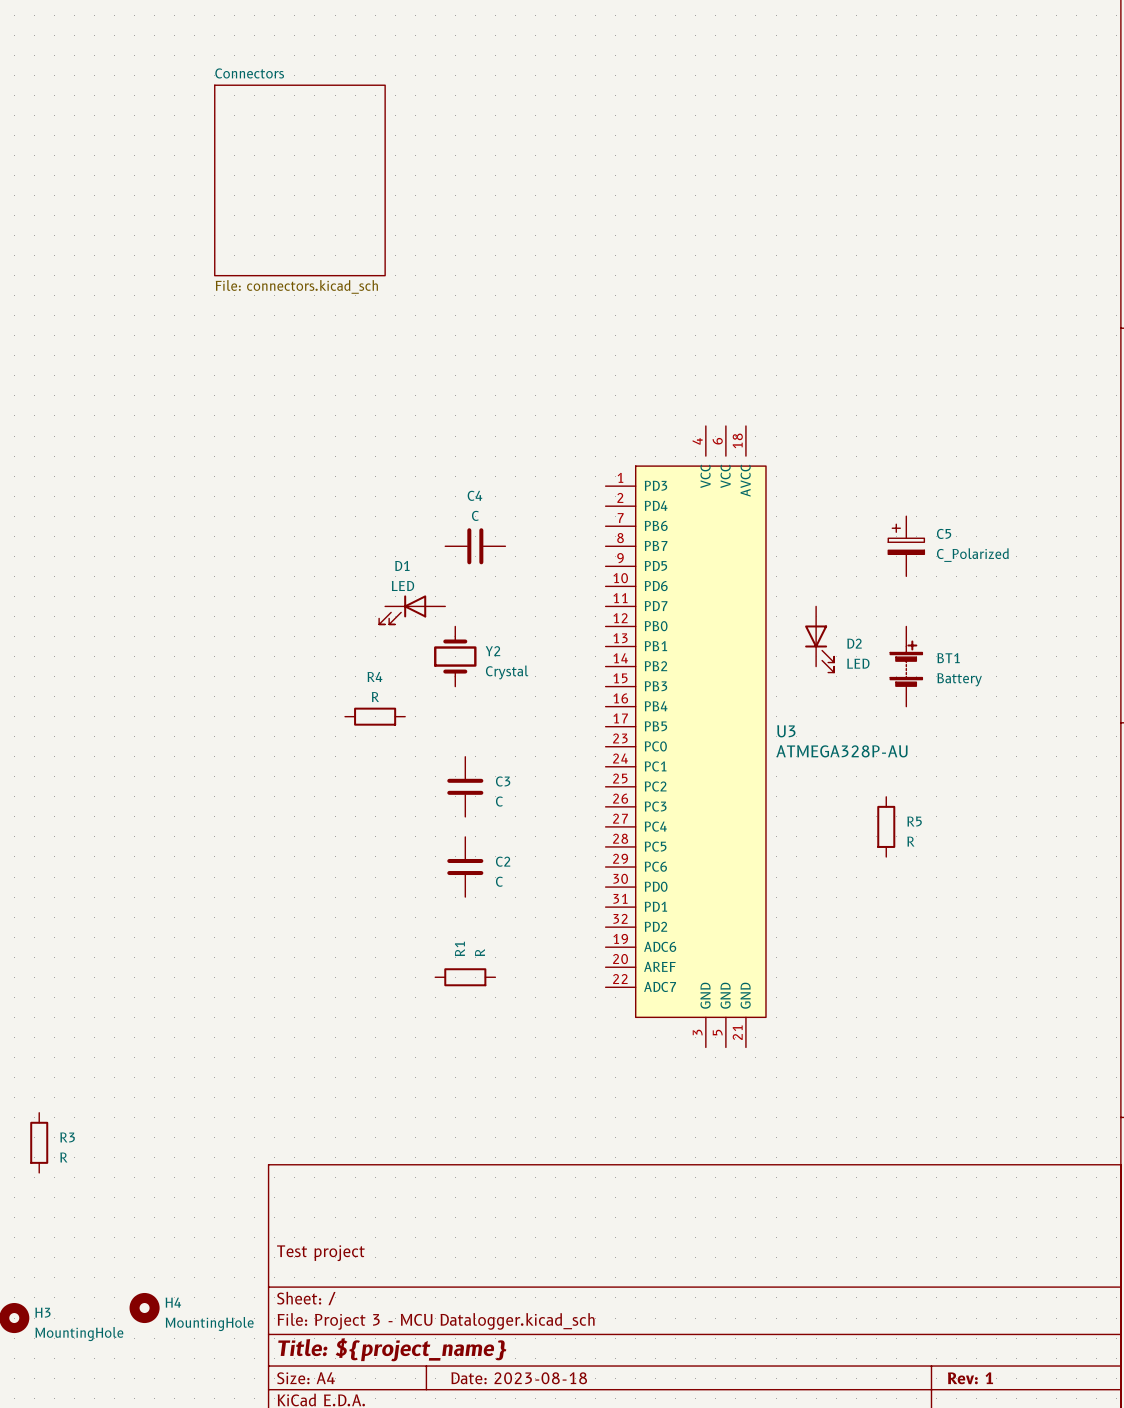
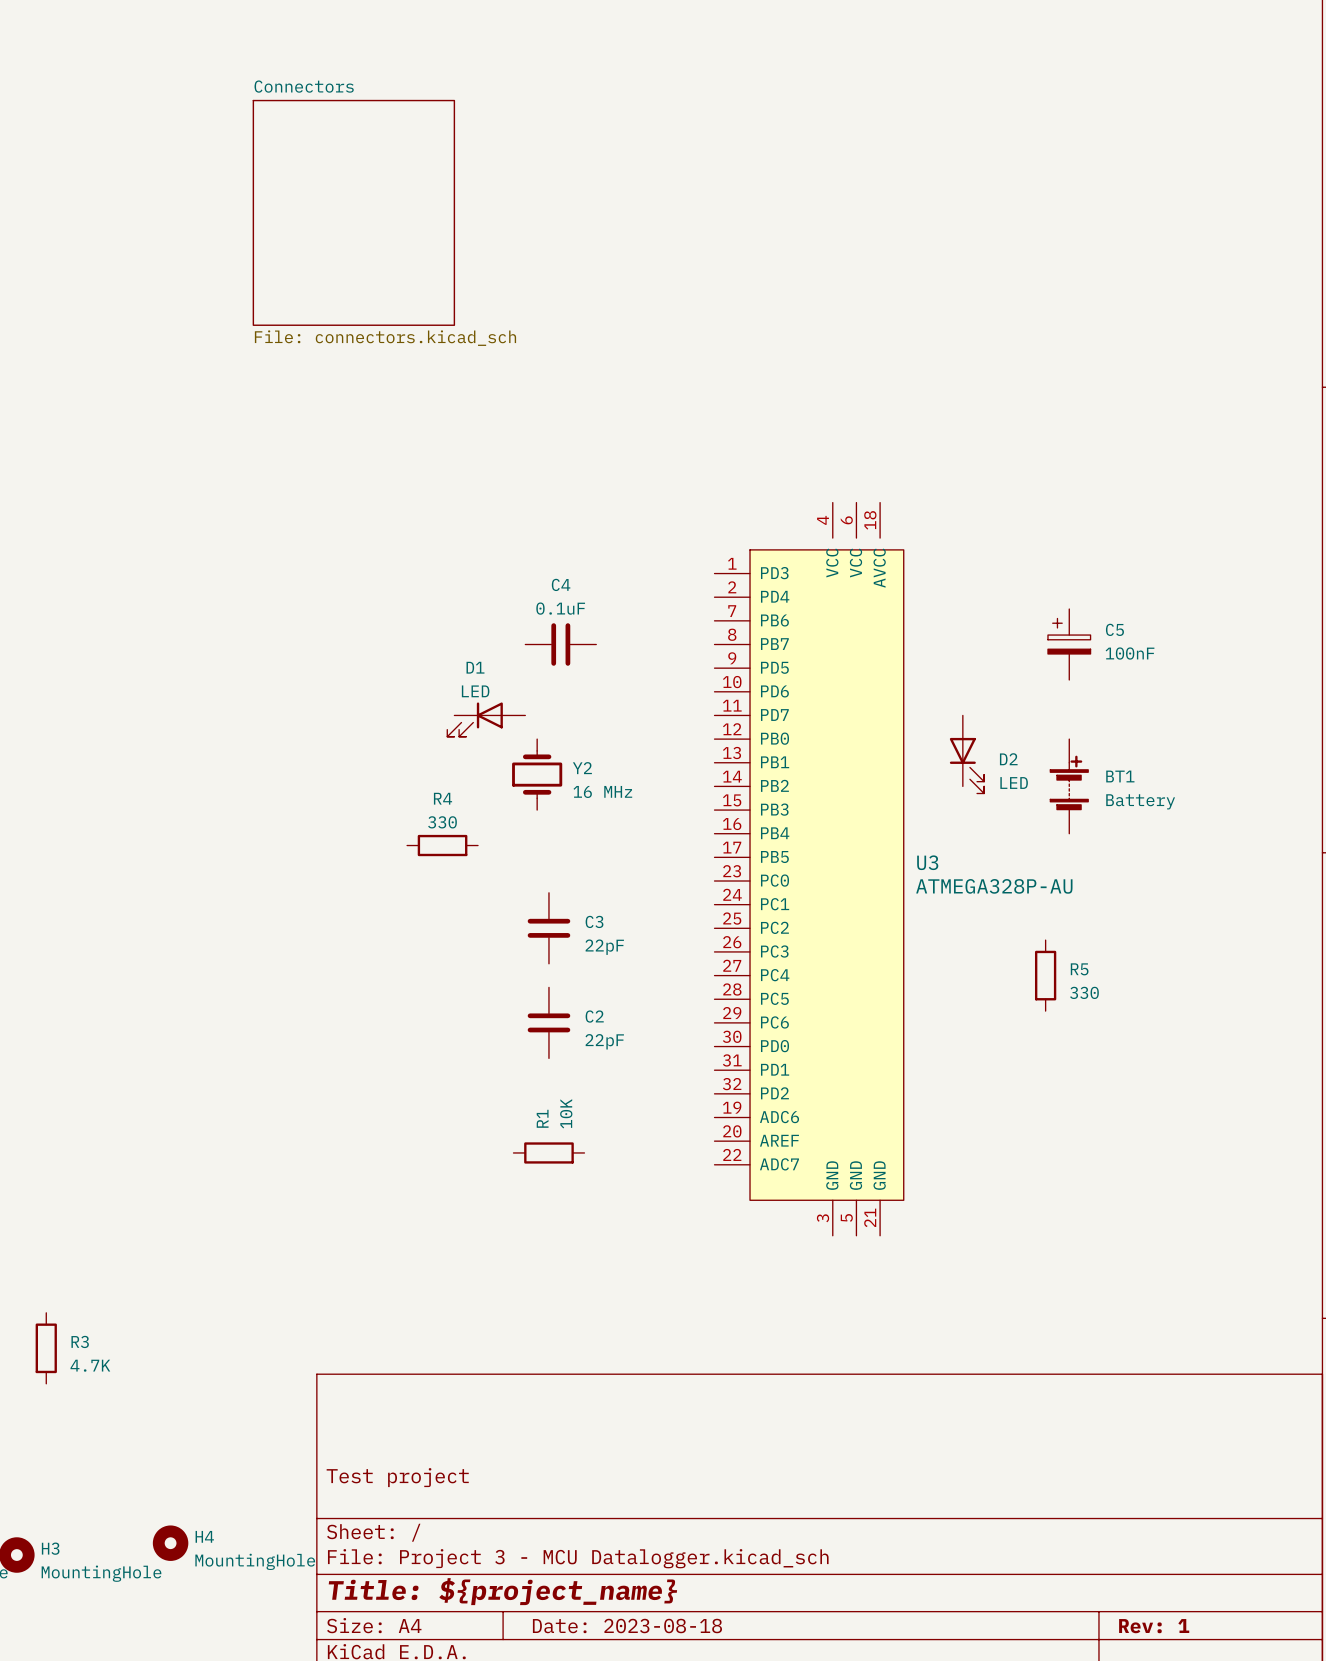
C4 value: C (475, 515) -> 0.1uF (560, 608)
C5 value: C_Polarized (972, 555) -> 100nF (1130, 653)
Y2 value: Crystal (507, 672) -> 16 MHz (602, 791)
R4 value: R (375, 697) -> 330 (442, 822)
C3 value: C (499, 801) -> 22pF (604, 947)
R5 value: R (910, 841) -> 330 (1084, 992)
C2 value: C (499, 881) -> 22pF (604, 1041)
R1 value: R (480, 952) -> 10K (566, 1113)
R3 value: R (63, 1157) -> 4.7K (90, 1365)

